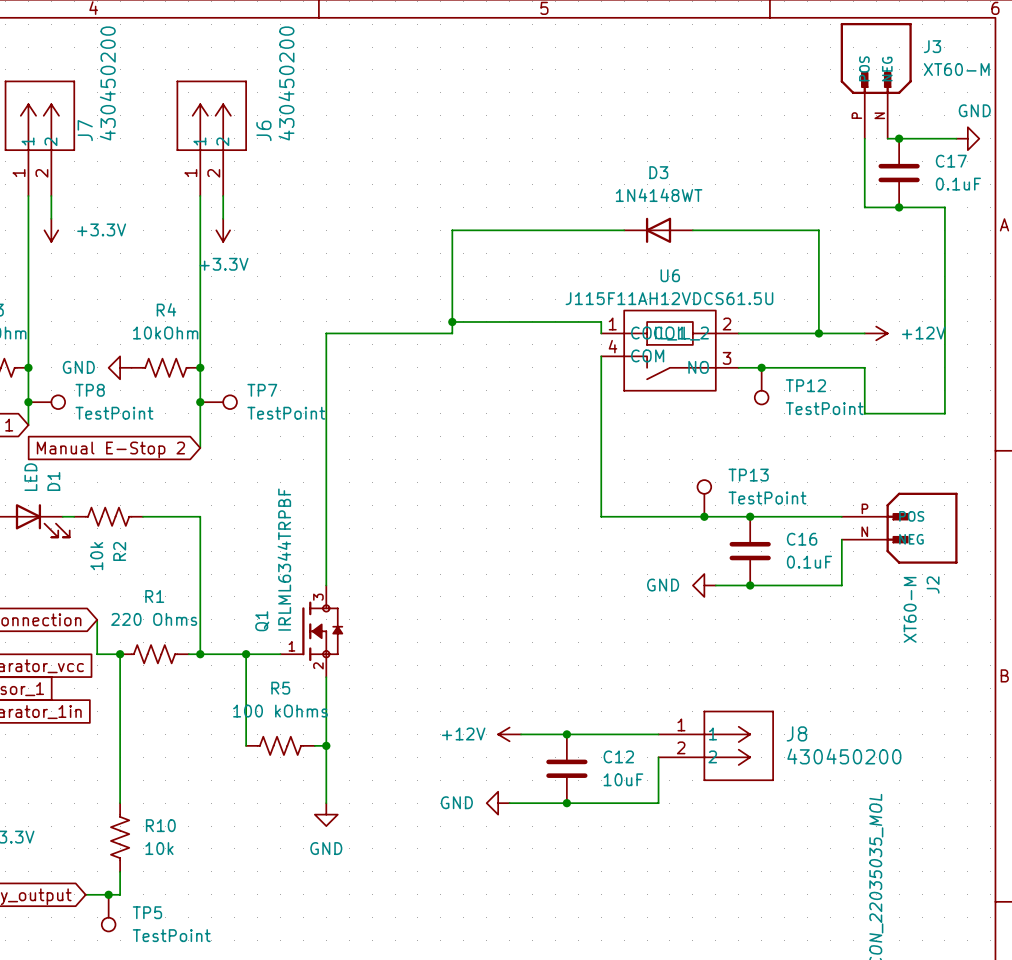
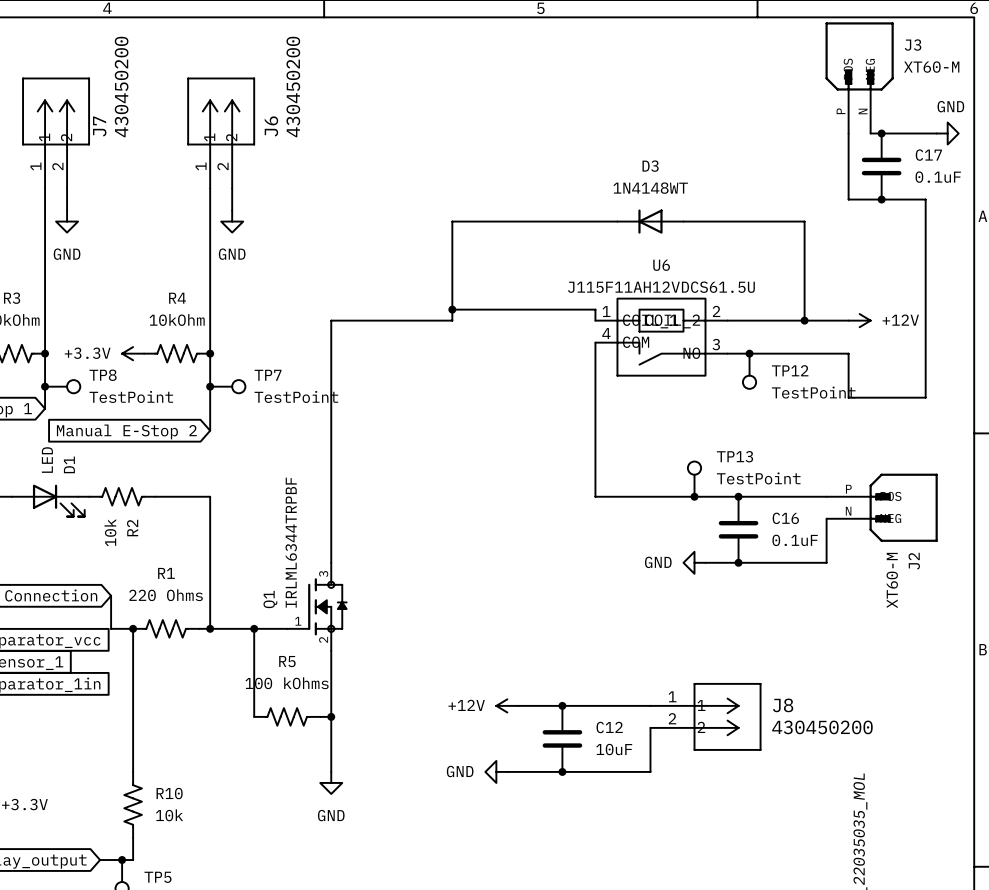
power symbol: +3.3V (51, 230) -> GND (67, 221)
power symbol: +3.3V (223, 230) -> GND (232, 221)
power symbol: GND (120, 367) -> +3.3V (133, 353)

